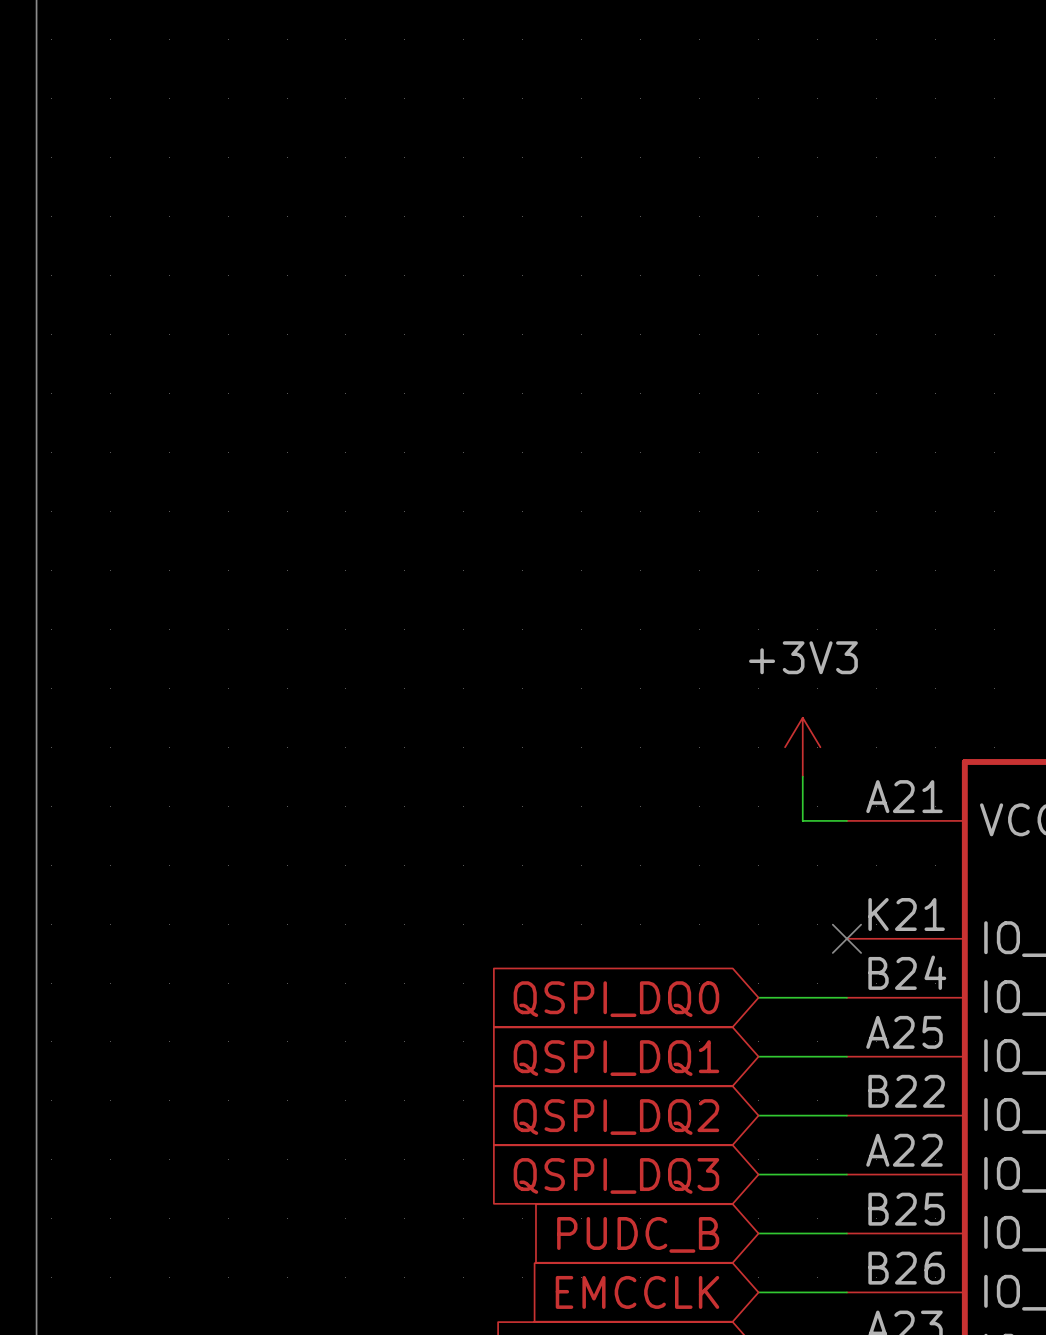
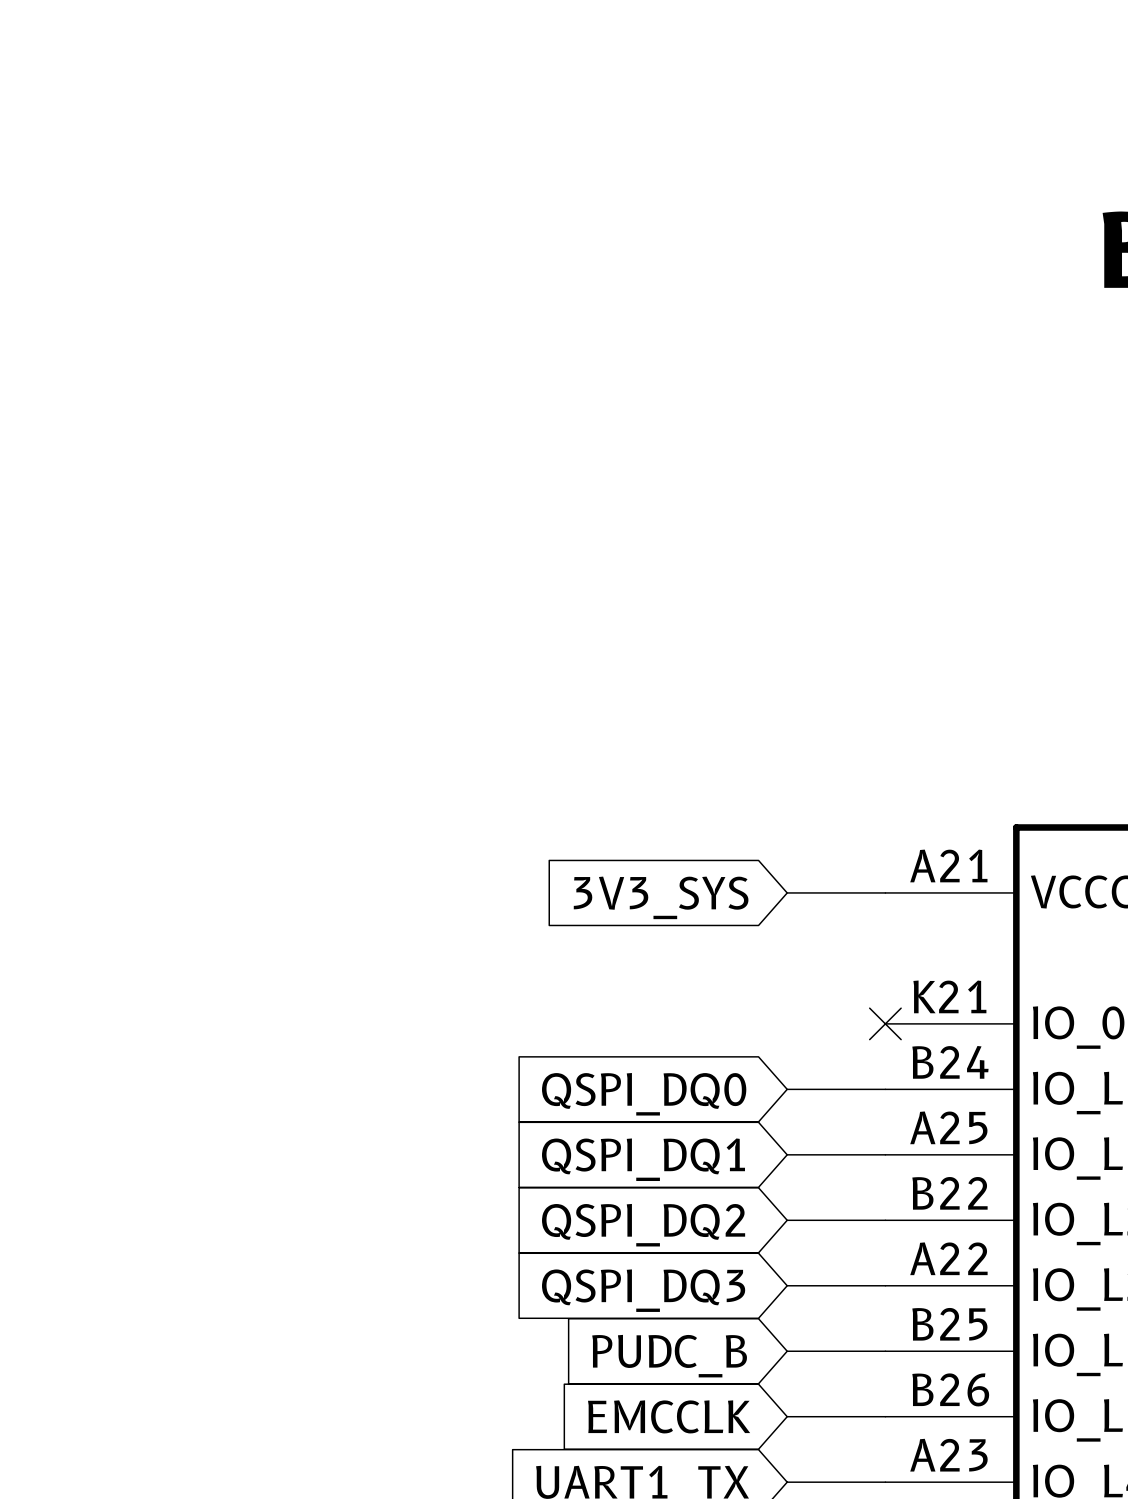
power symbol: +3V3 (802, 747) -> none
wire: (802, 776) (802, 820) -> (787, 892) (836, 892)
global label: none -> 3V3_SYS (661, 897)

